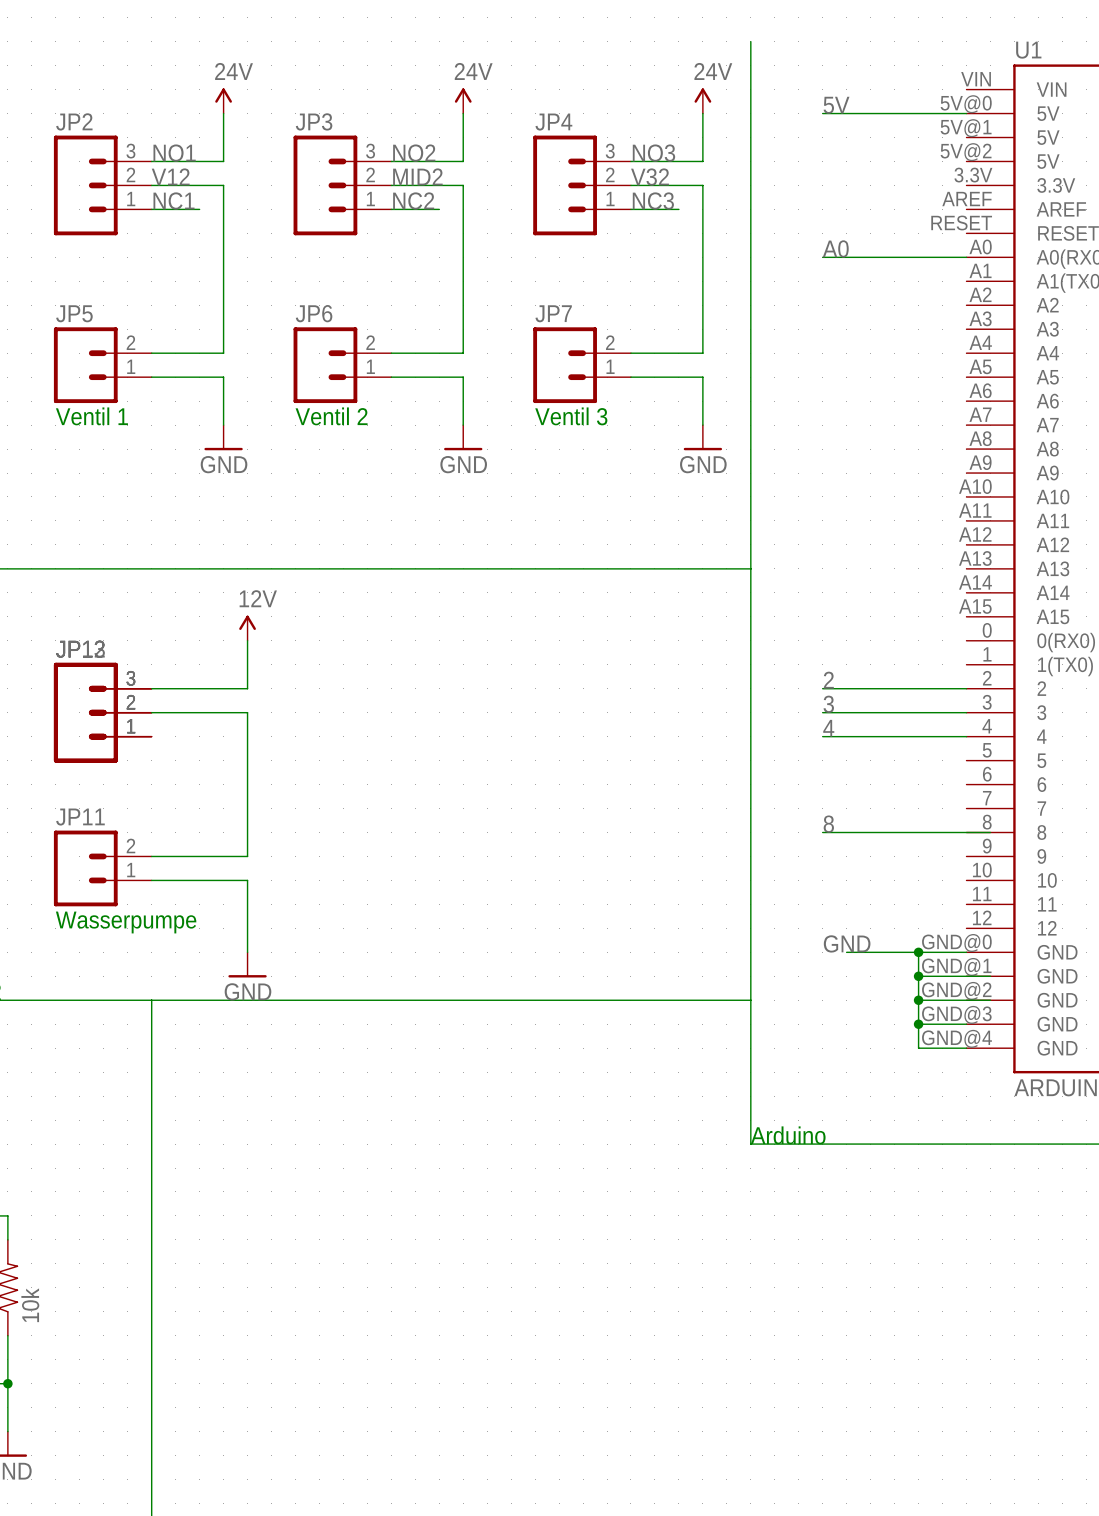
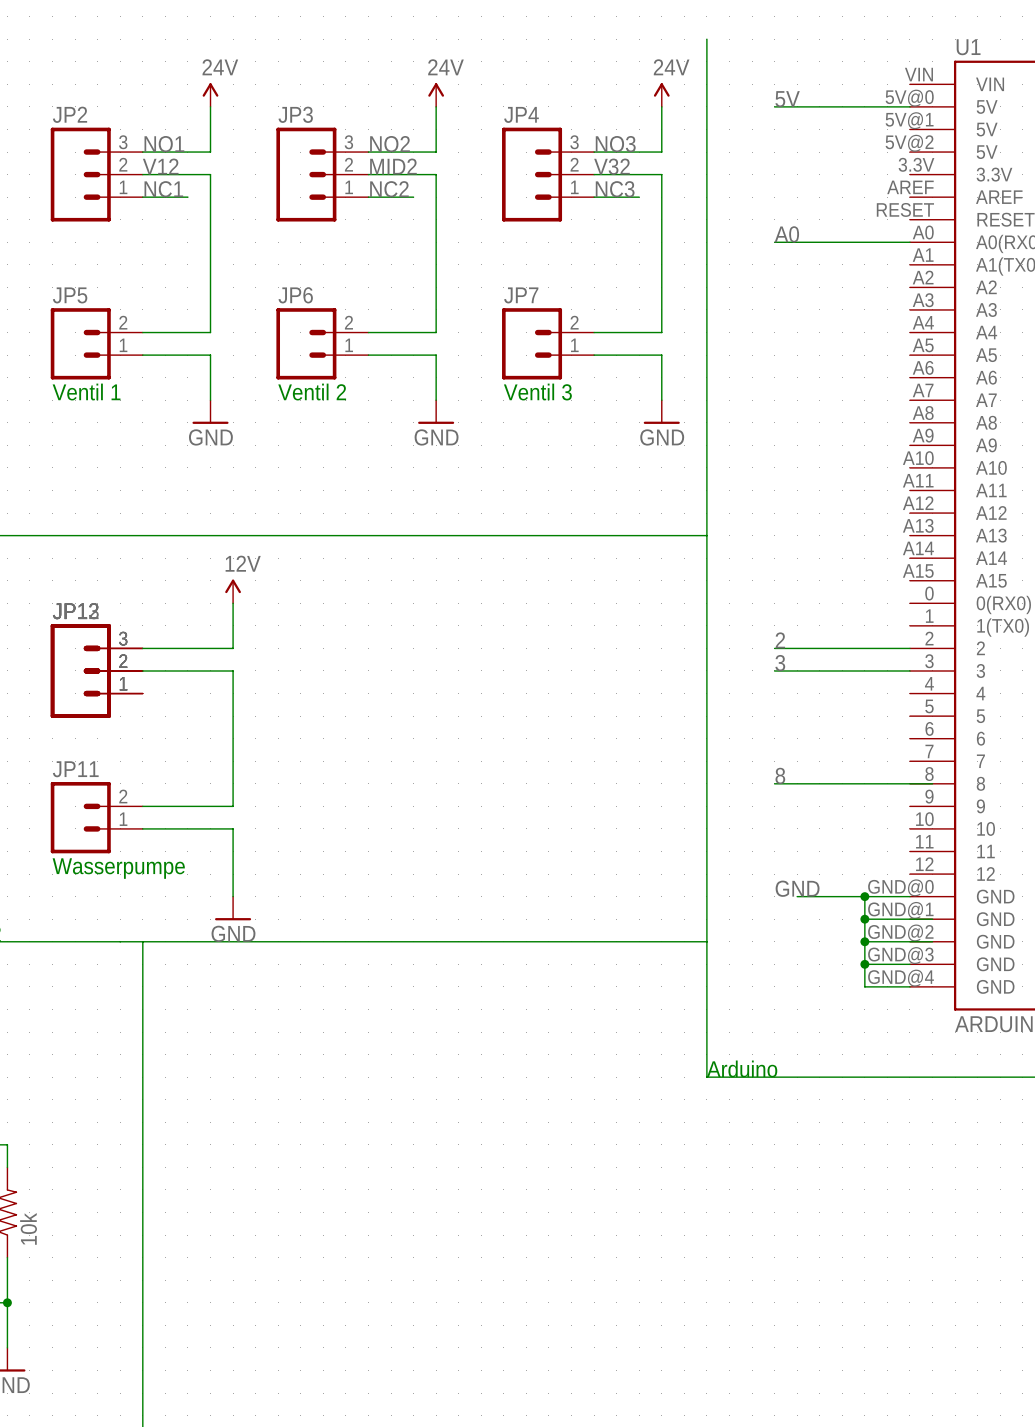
label: 4 (828, 728) -> none
wire: (822, 736) (966, 736) -> none

